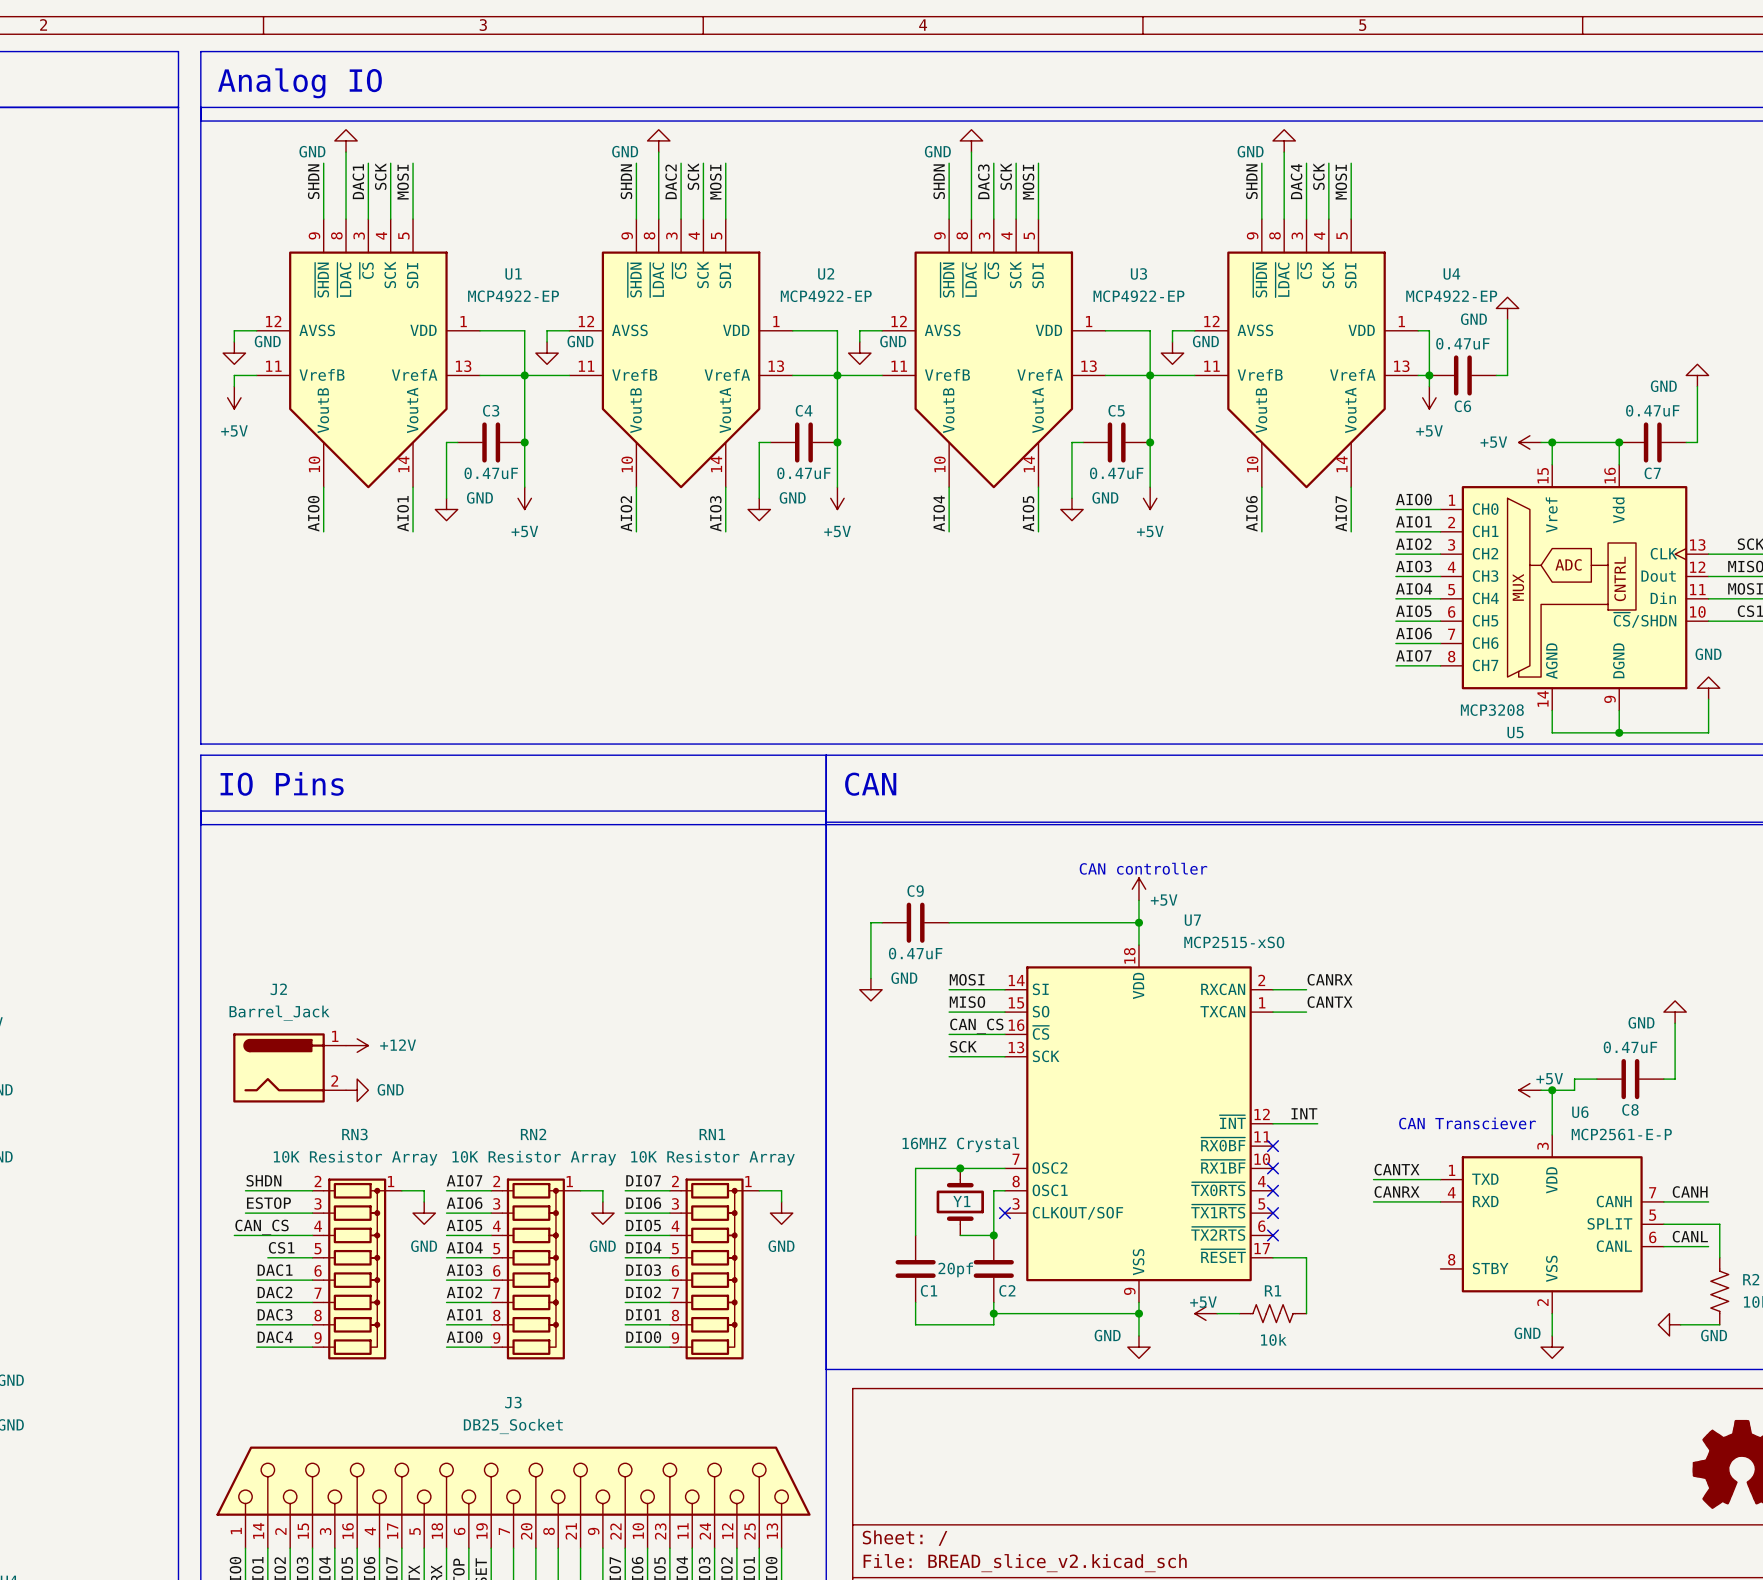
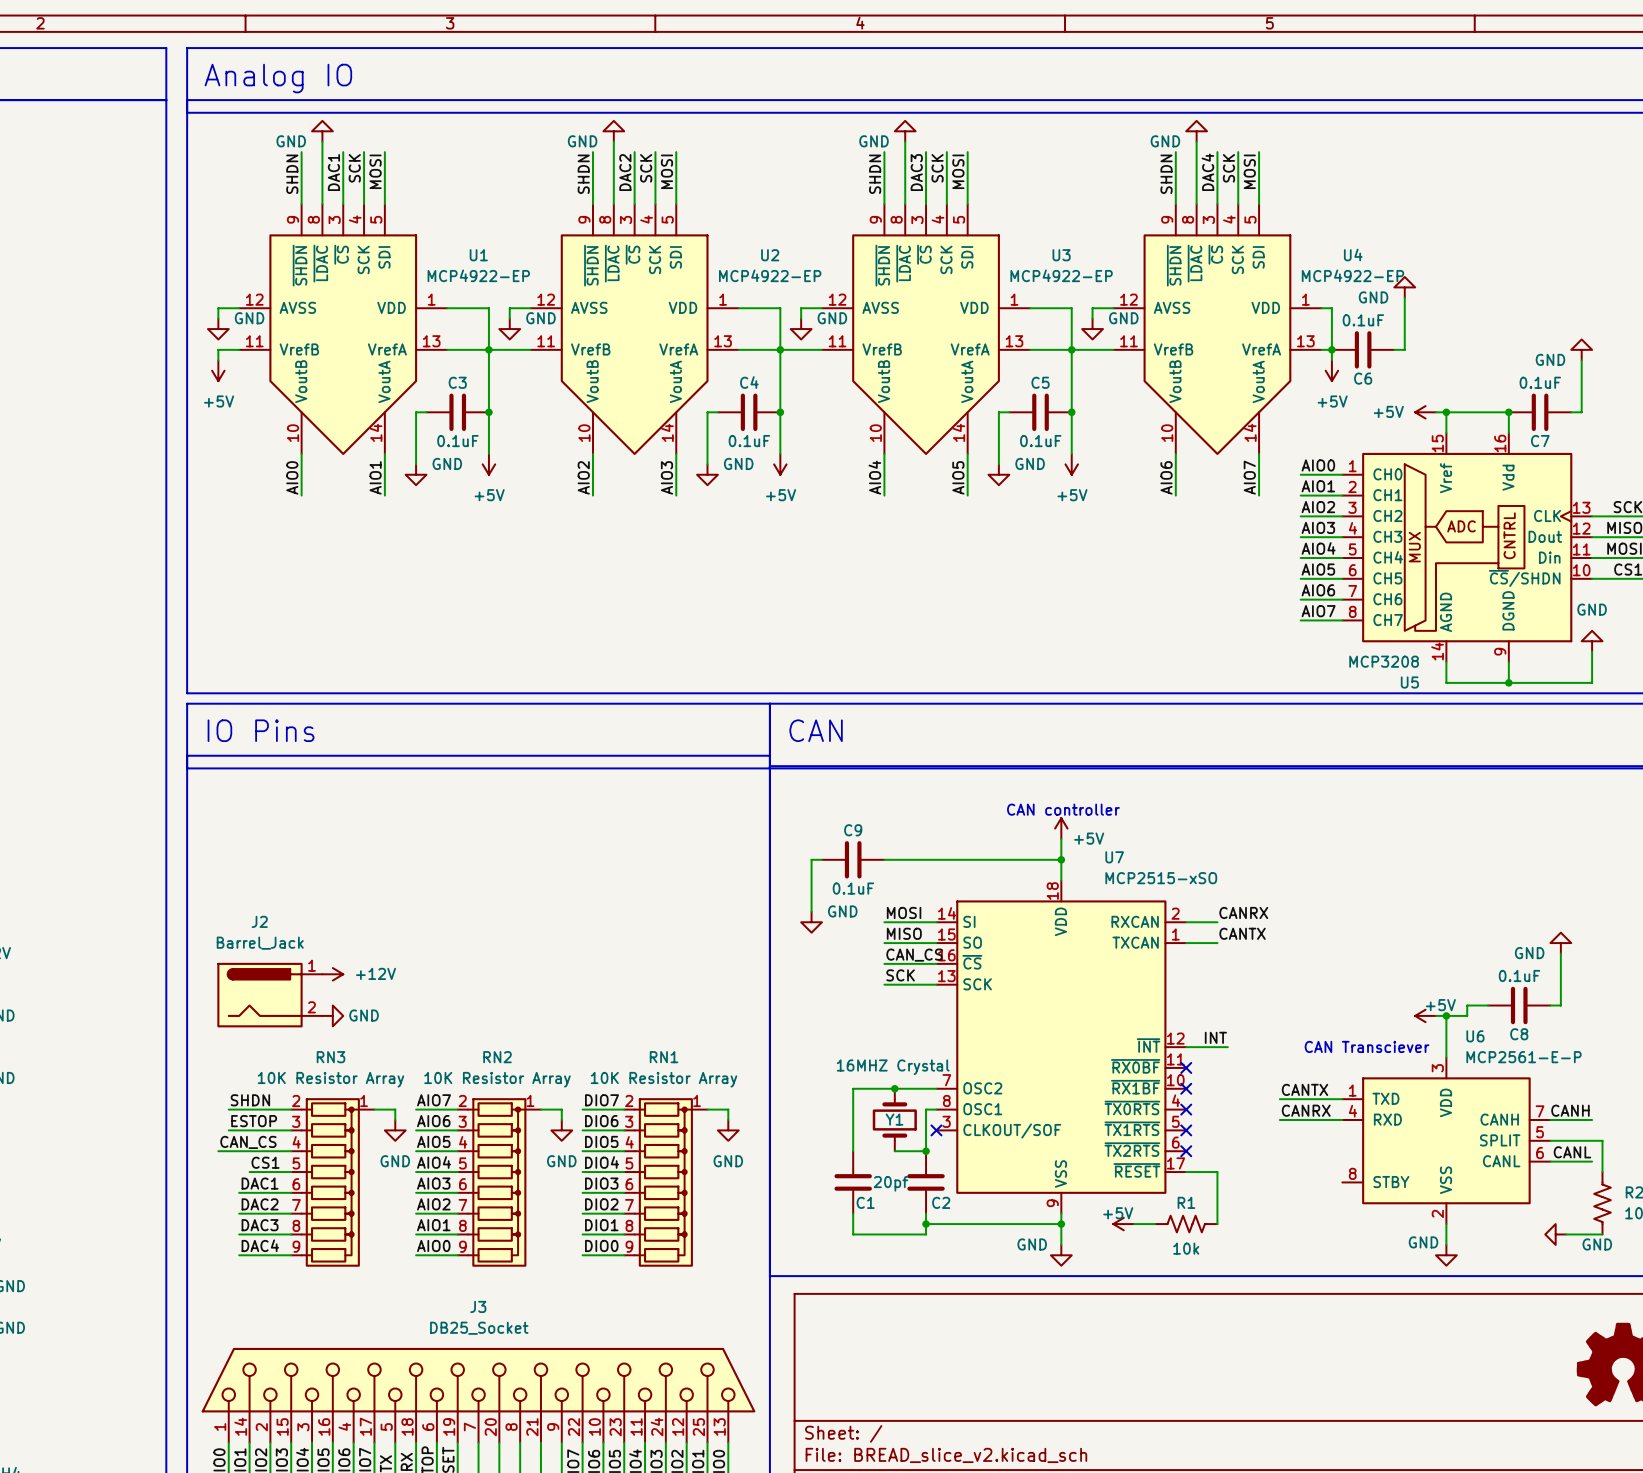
C6 value: 0.47uF (1462, 343) -> 0.1uF (1363, 320)
C7 value: 0.47uF (1652, 410) -> 0.1uF (1540, 382)
C3 value: 0.47uF (491, 473) -> 0.1uF (457, 441)
C4 value: 0.47uF (803, 473) -> 0.1uF (749, 441)
C5 value: 0.47uF (1116, 473) -> 0.1uF (1040, 441)
C9 value: 0.47uF (915, 953) -> 0.1uF (853, 888)
C8 value: 0.47uF (1630, 1047) -> 0.1uF (1519, 975)

